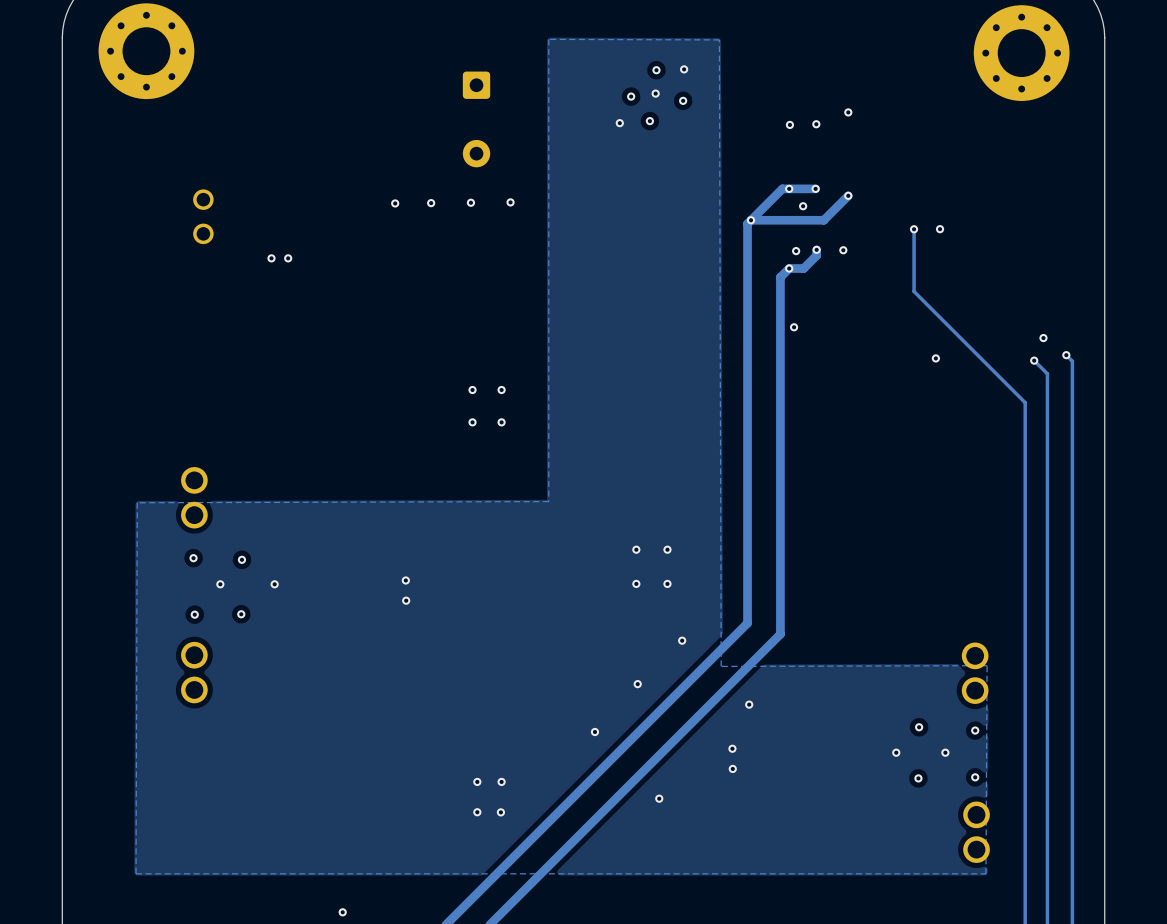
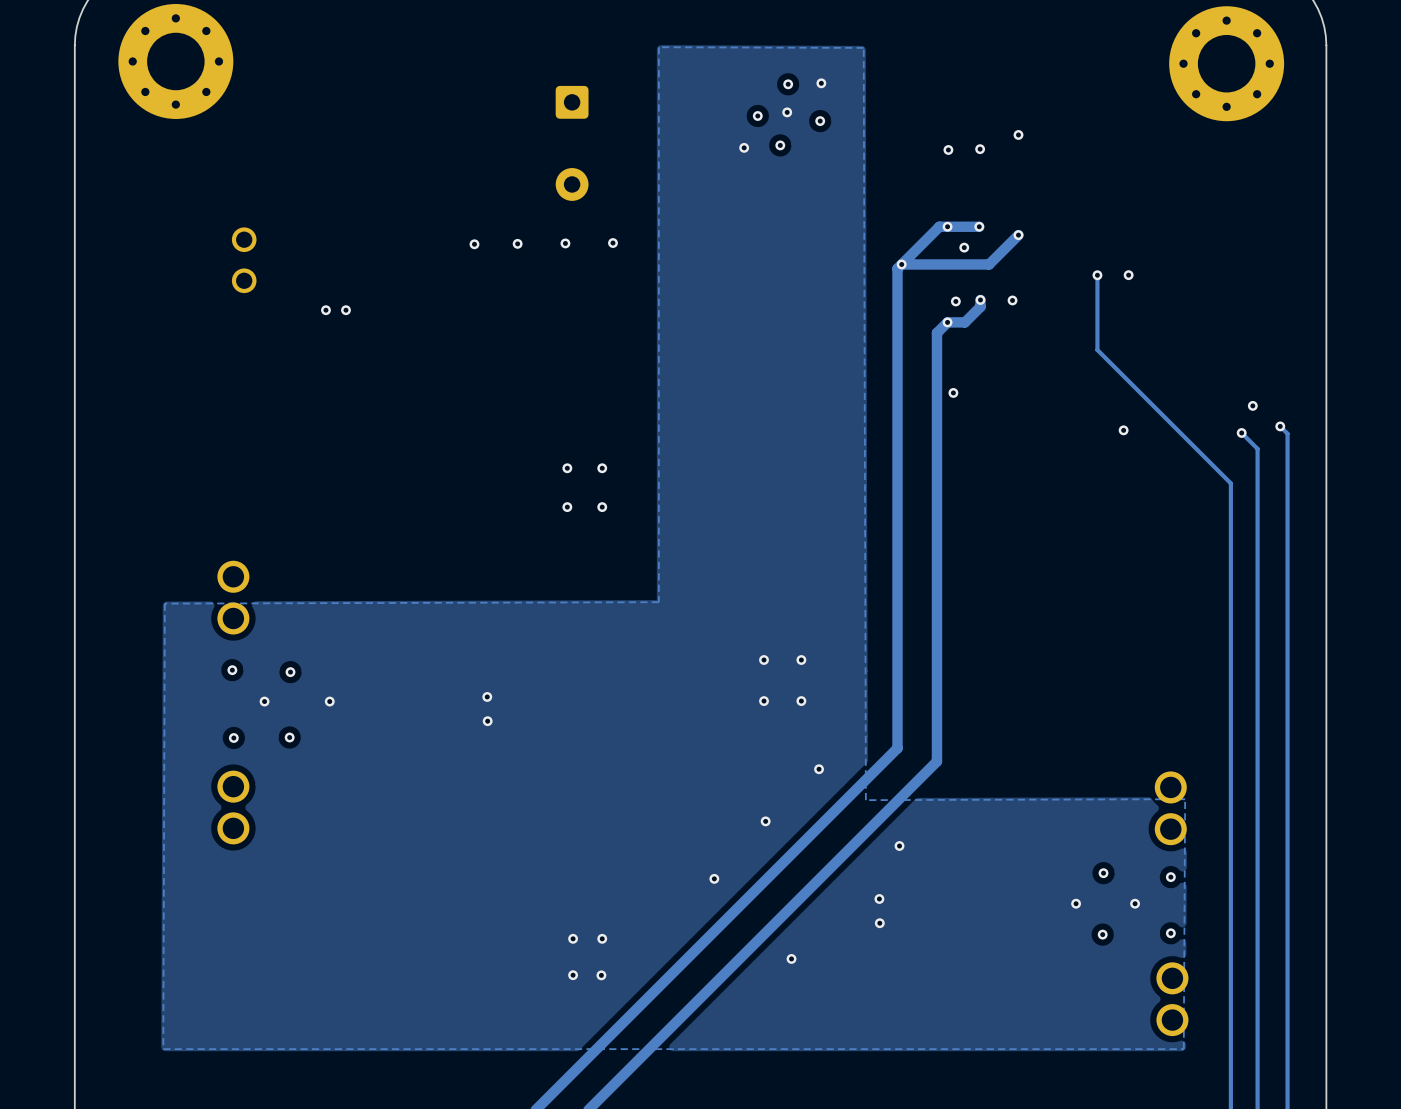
via: (342, 912) -> none

